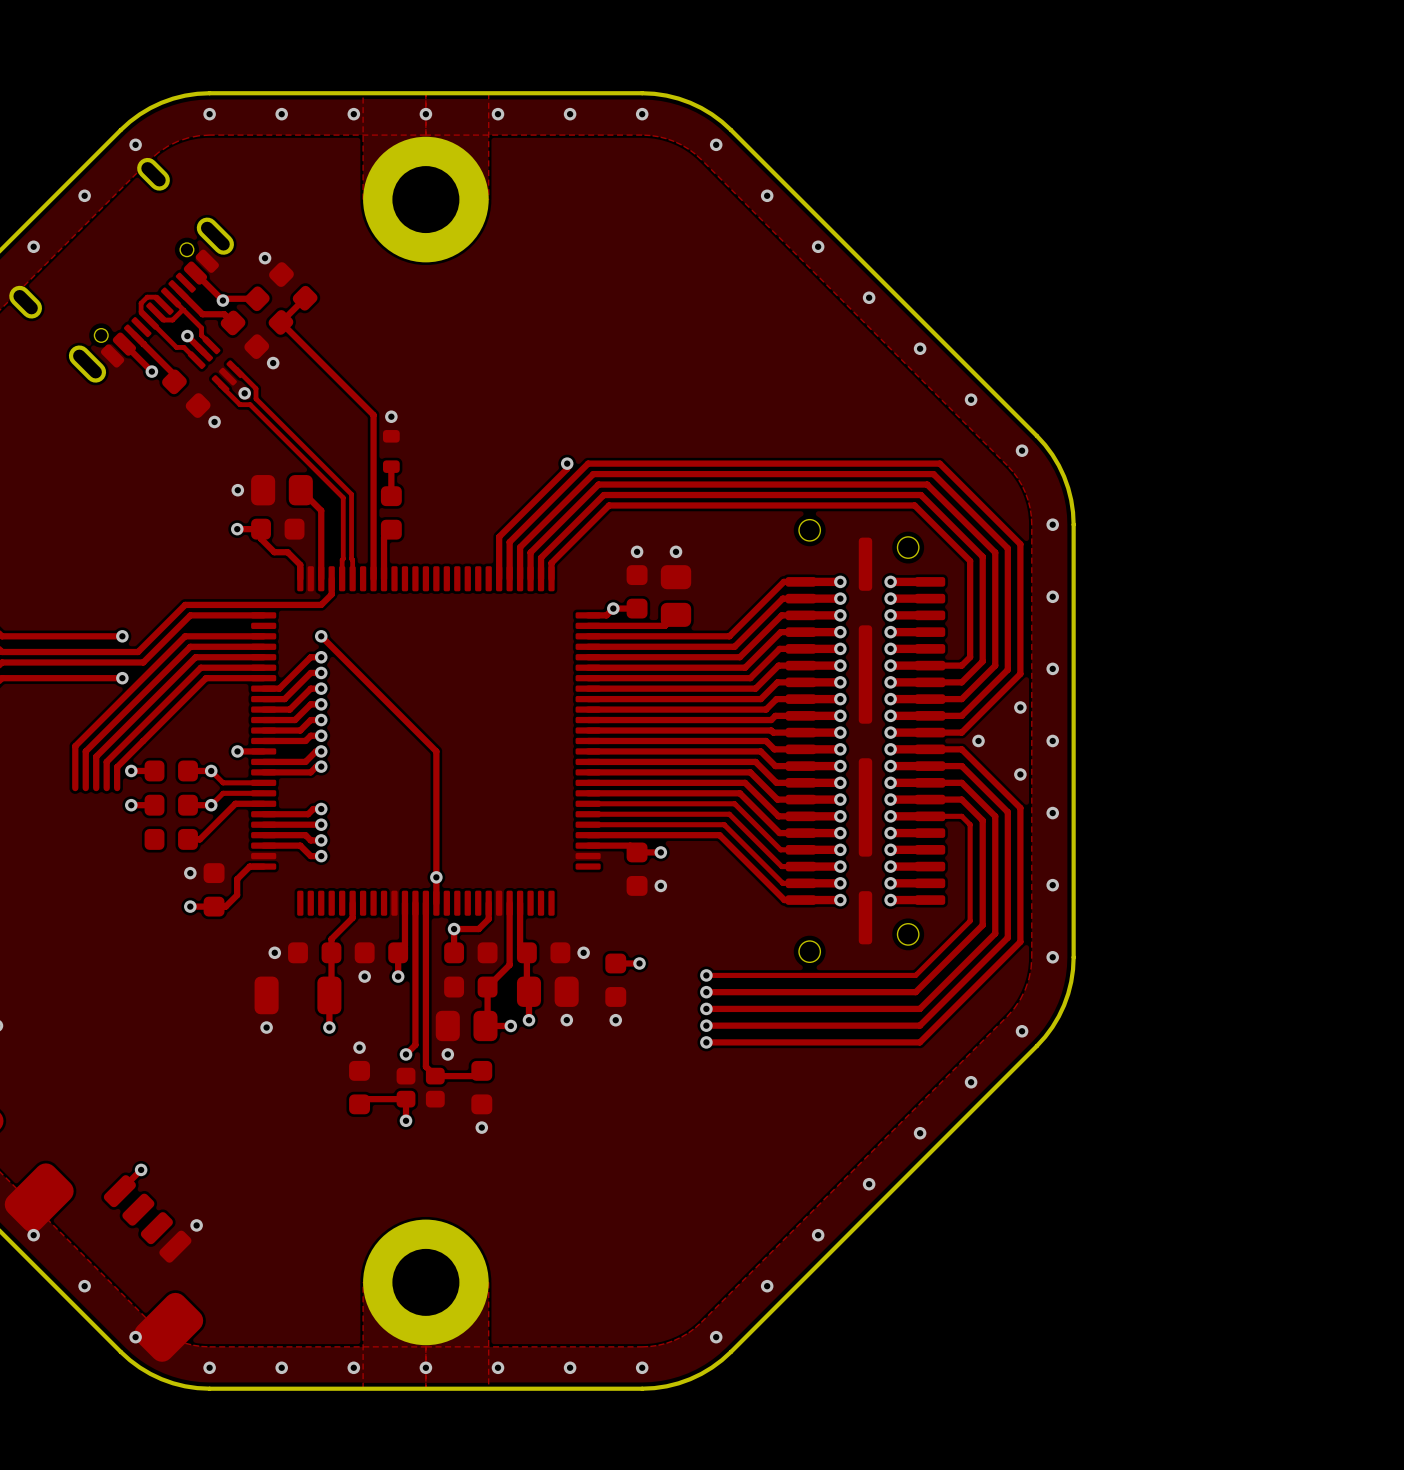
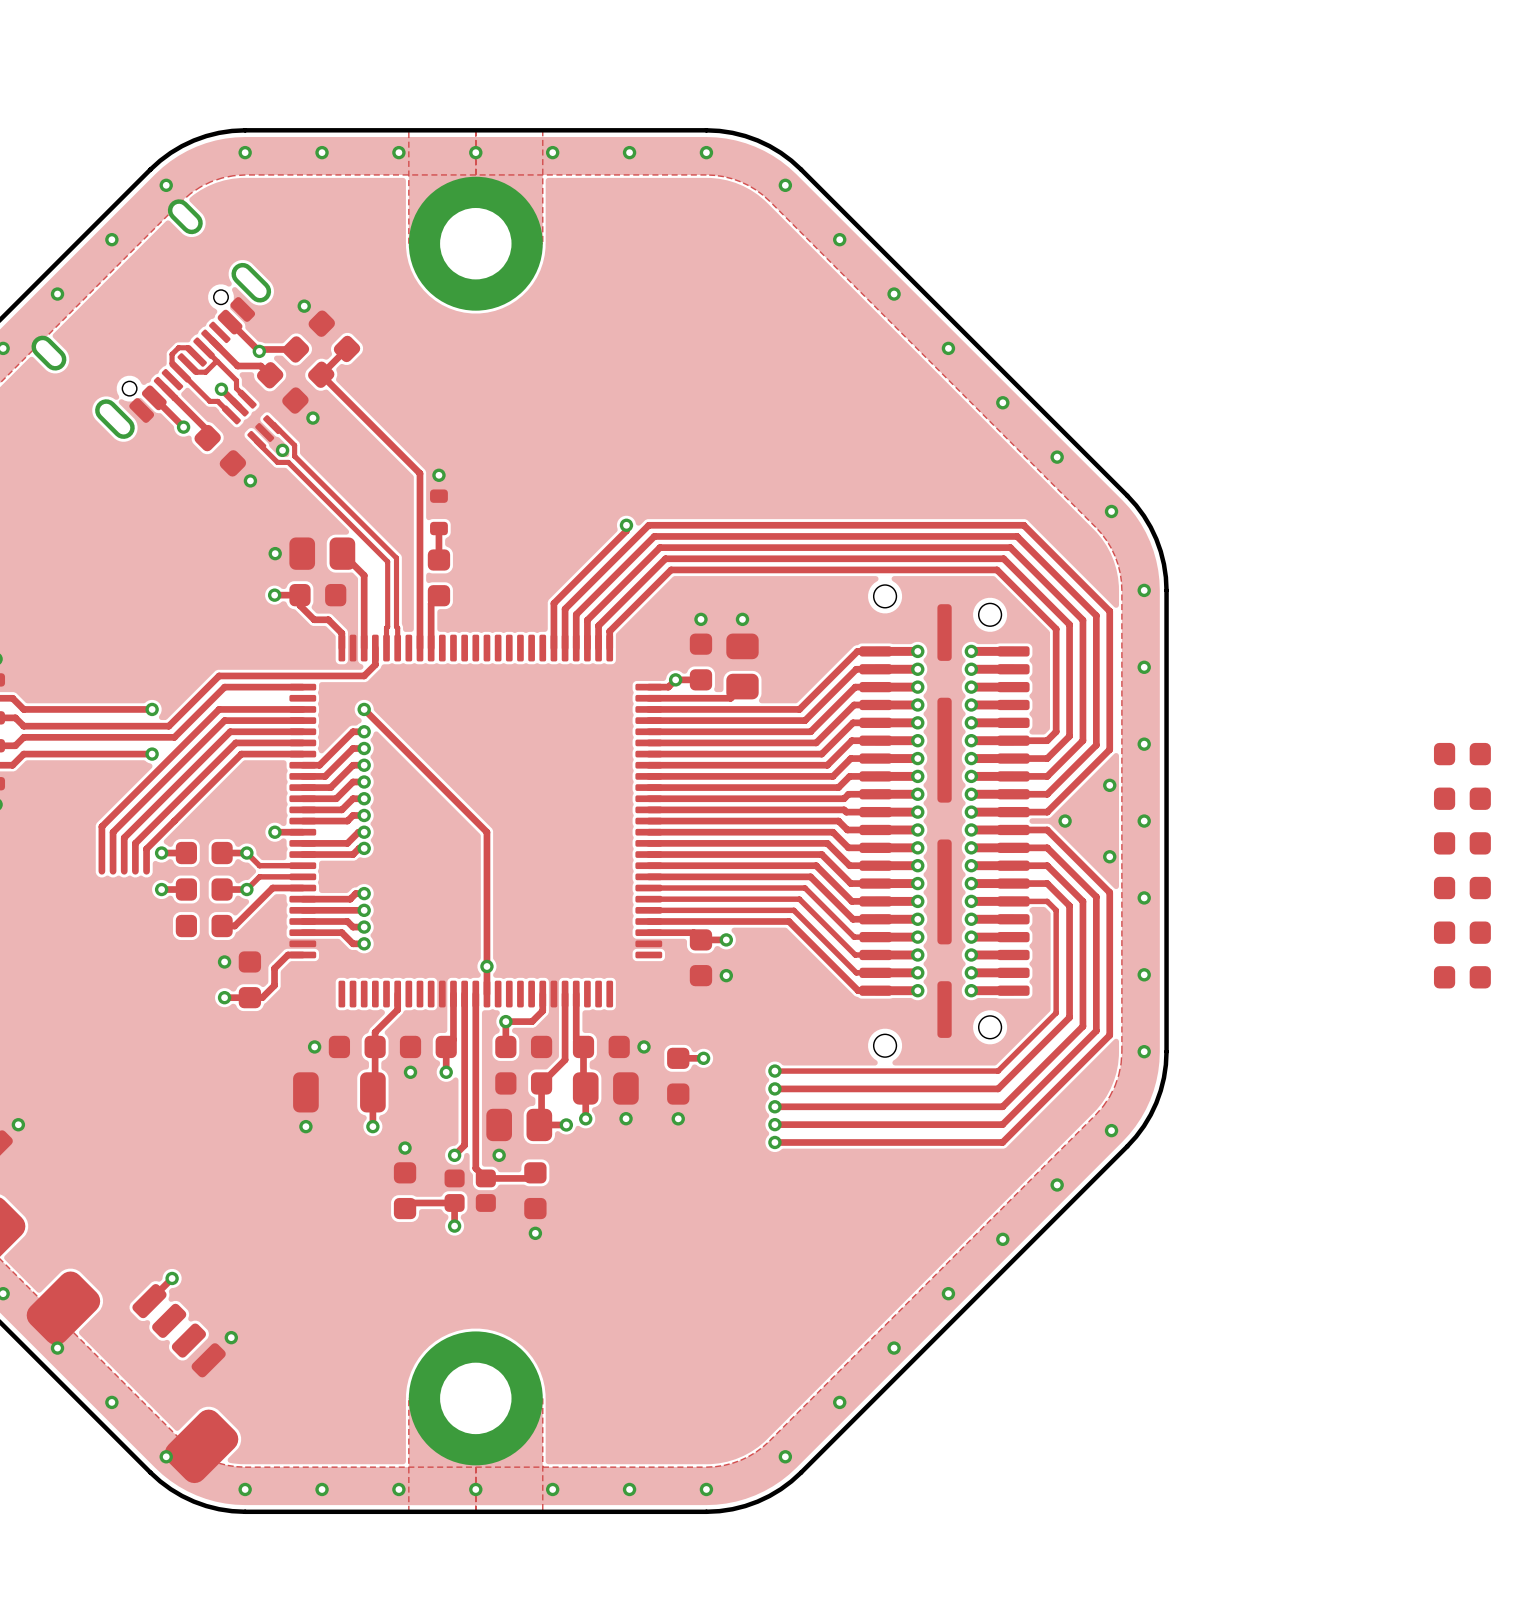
part: none -> (1462, 754)
part: none -> (1462, 798)
part: none -> (1462, 843)
part: none -> (1462, 888)
part: none -> (1462, 932)
part: none -> (1462, 977)

